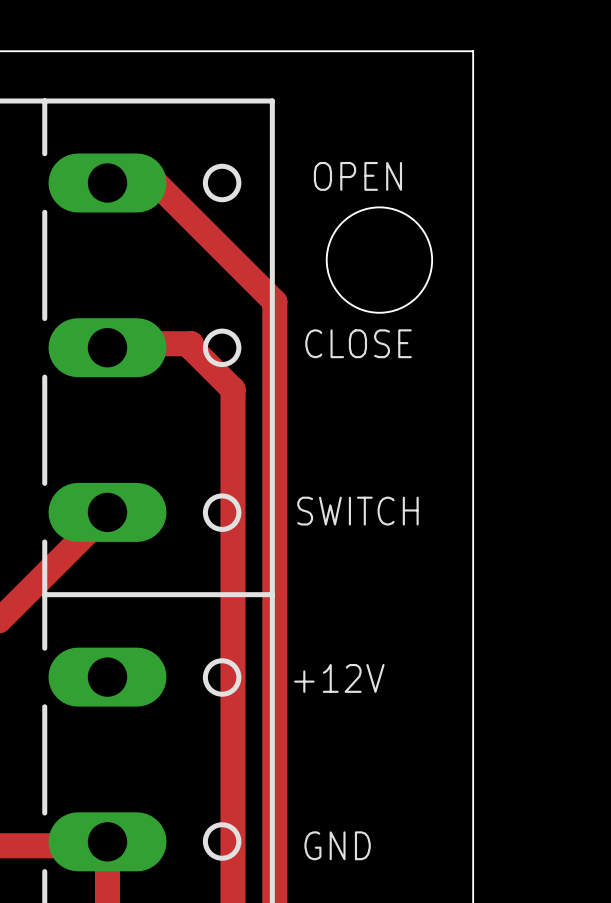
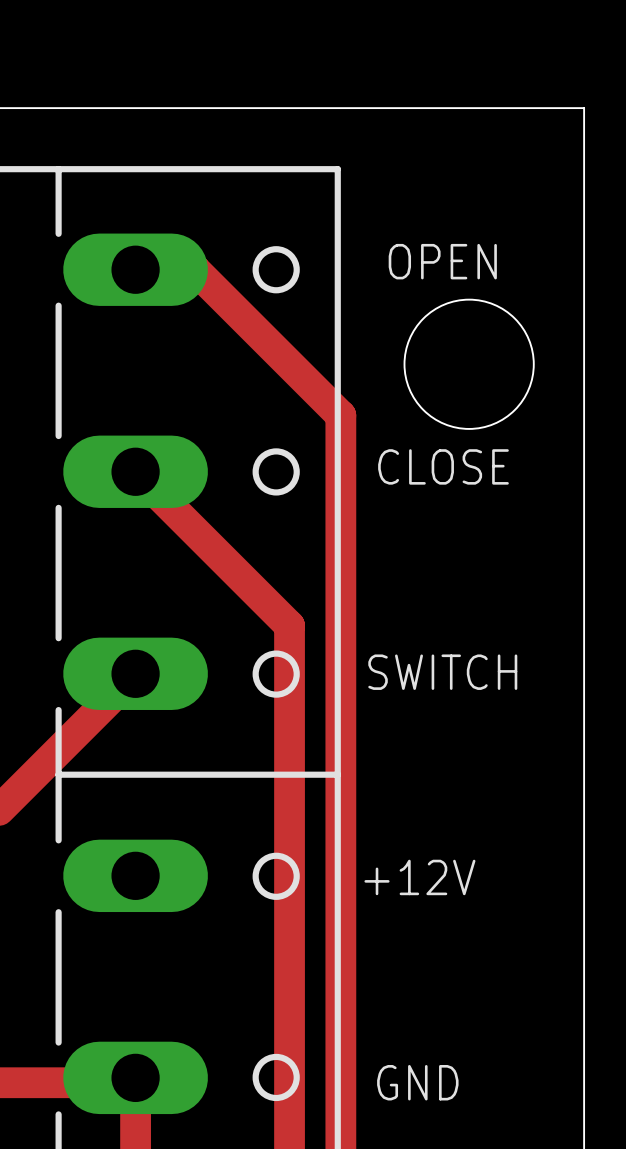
track: (107, 347) (111, 343) (191, 343) (191, 347) (233, 389) (233, 473) -> (135, 471) (289, 625)

